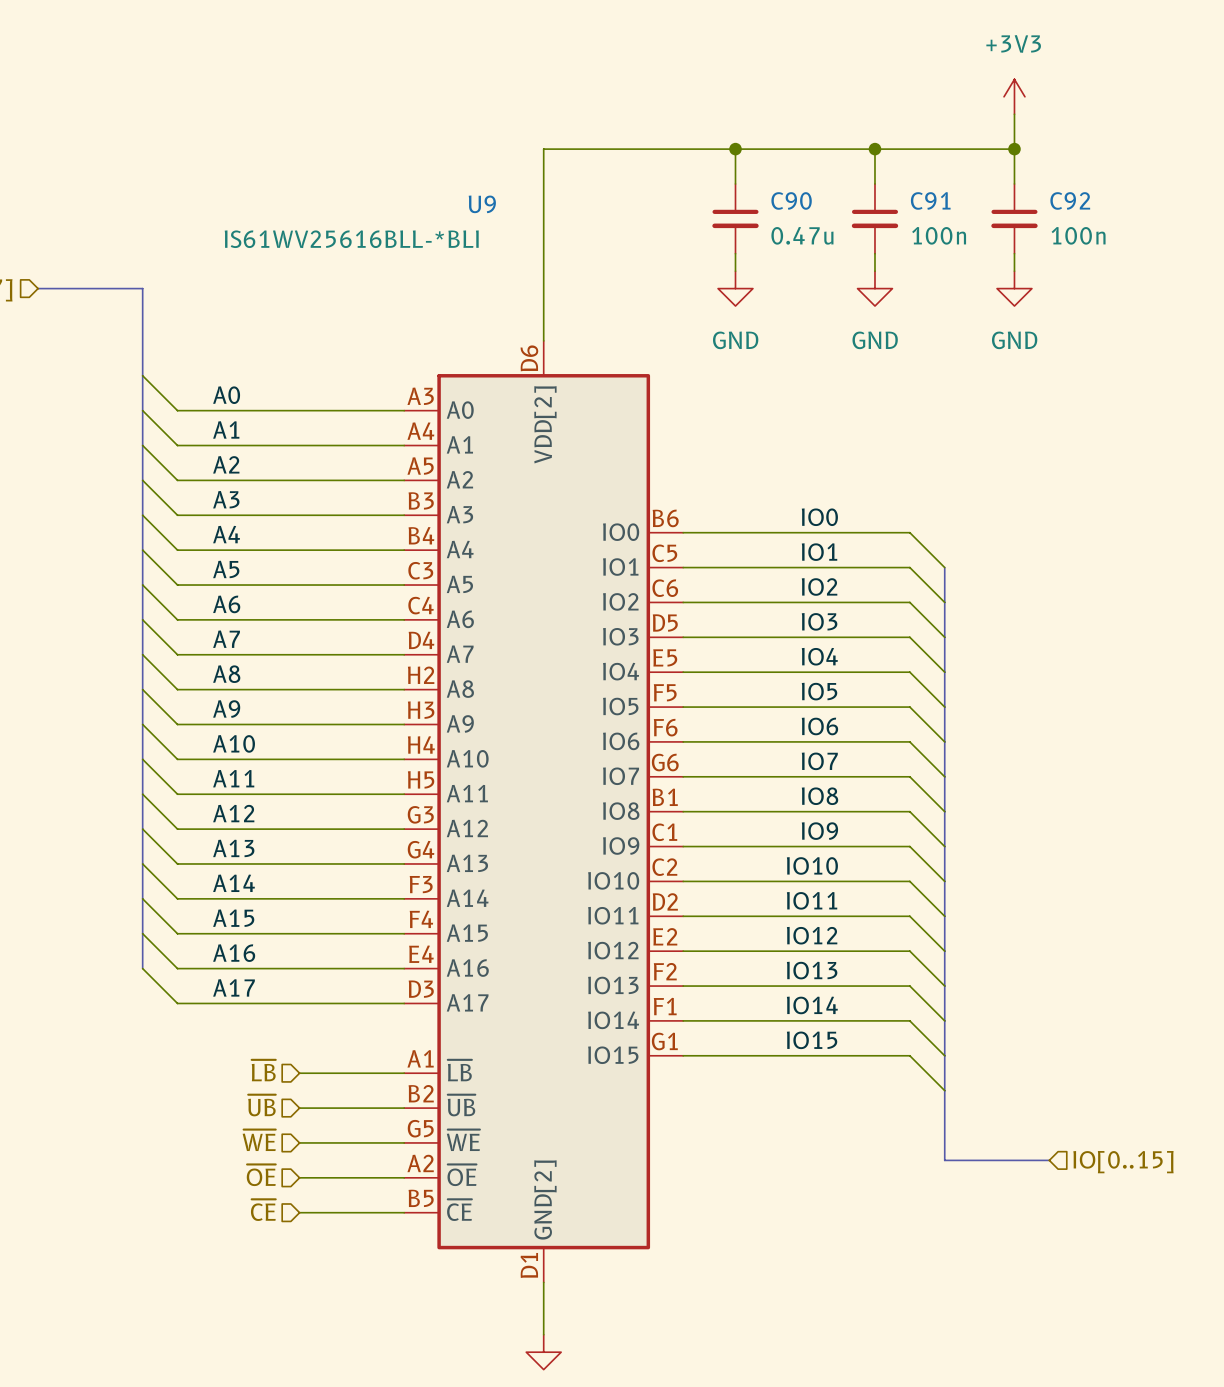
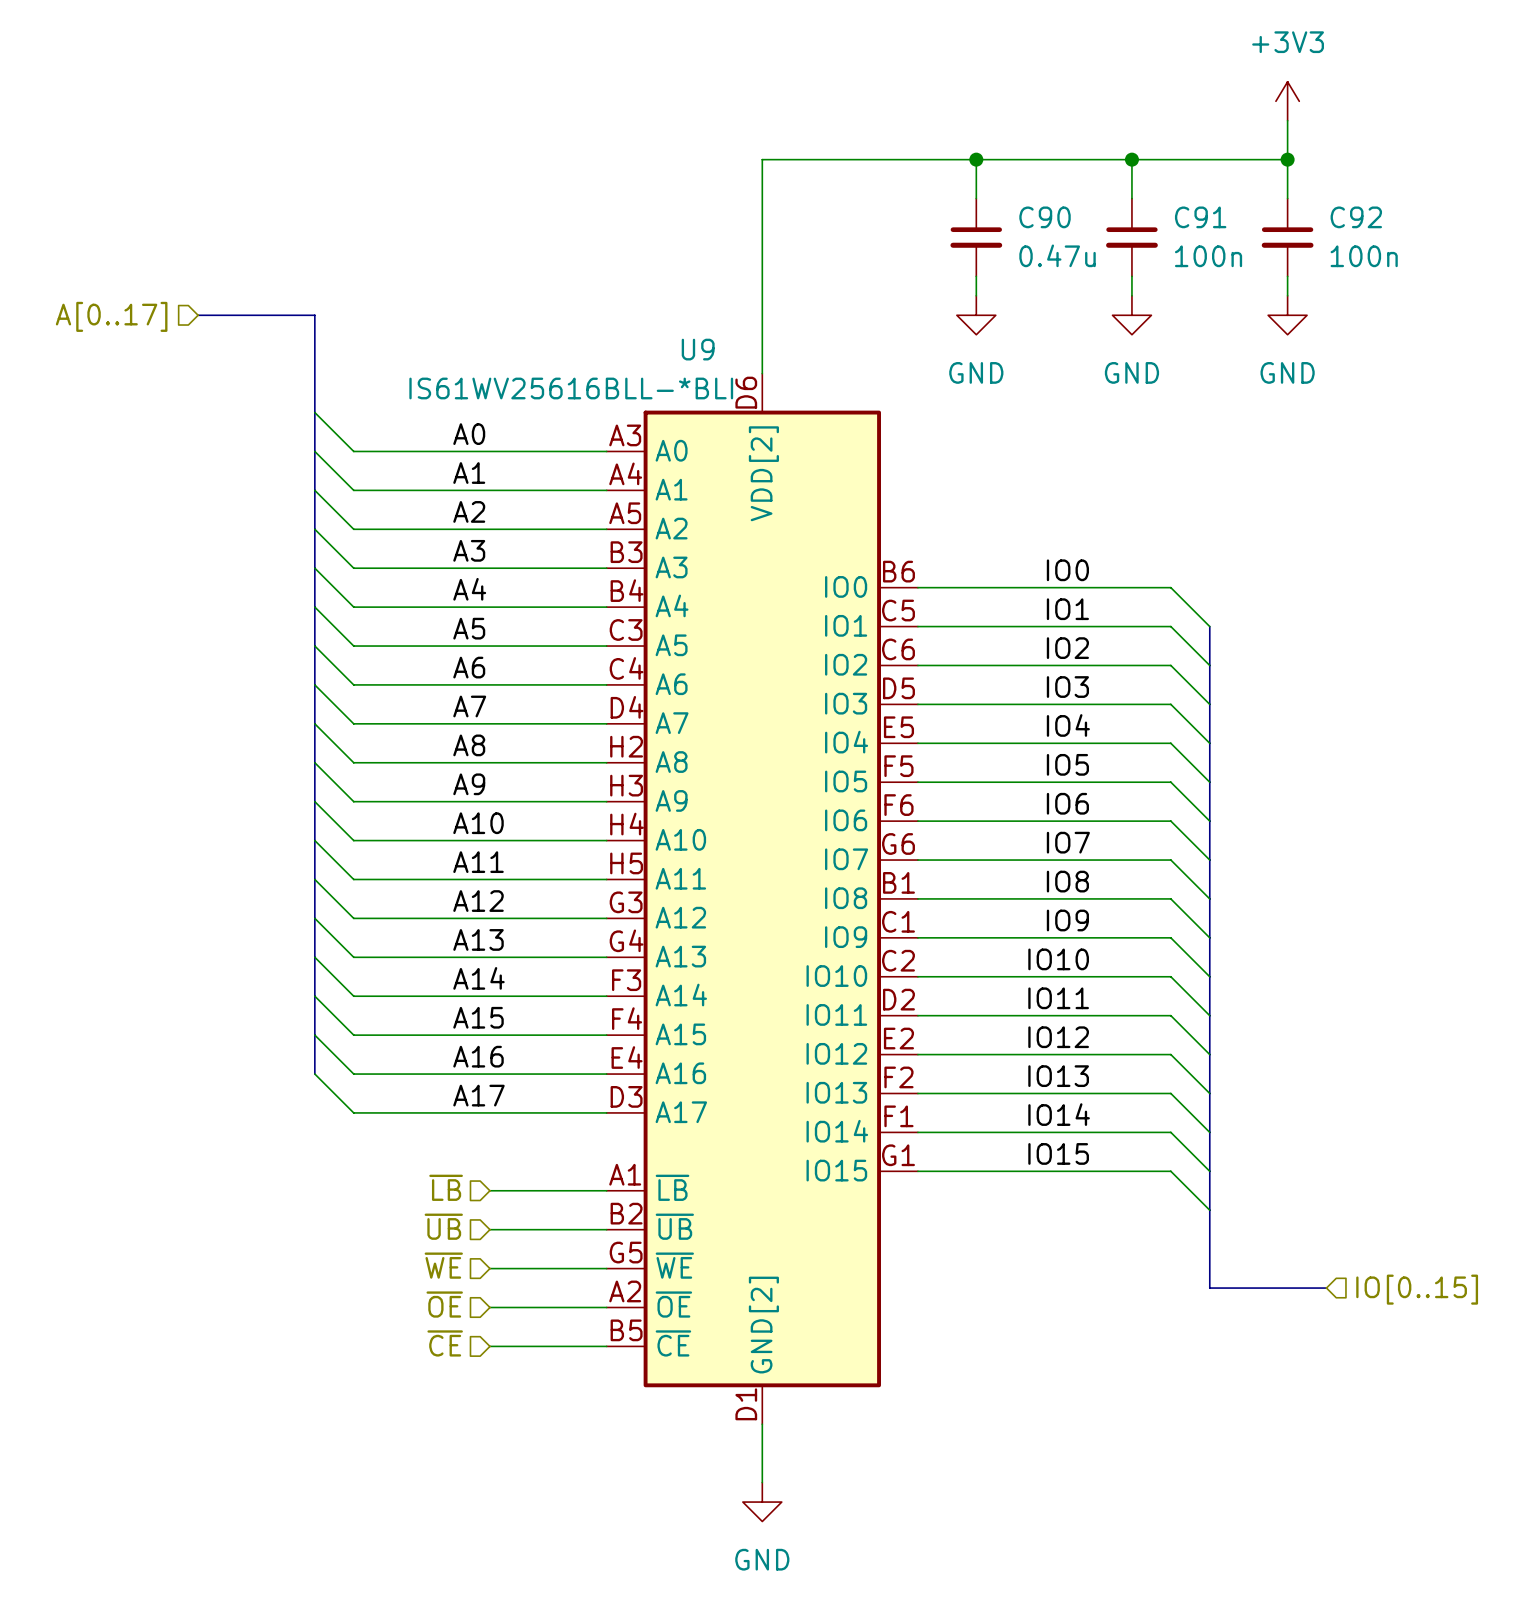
U9 name position: U9 (482, 204) -> U9 (698, 349)
U9 value position: IS61WV25616BLL-*BLI (351, 239) -> IS61WV25616BLL-*BLI (571, 388)
label position: A0 (226, 395) -> A0 (469, 434)
label position: A1 (226, 429) -> A1 (469, 473)
label position: A2 (226, 464) -> A2 (469, 511)
label position: A3 (226, 499) -> A3 (469, 550)
label position: A4 (226, 534) -> A4 (469, 589)
label position: A5 (226, 569) -> A5 (469, 628)
label position: A6 (226, 604) -> A6 (469, 667)
label position: A7 (226, 639) -> A7 (469, 706)
label position: A8 (226, 674) -> A8 (469, 745)
label position: A9 (226, 709) -> A9 (469, 784)
label position: A10 (234, 743) -> A10 (478, 823)
label position: A11 (233, 778) -> A11 (478, 862)
label position: A12 (233, 813) -> A12 (478, 901)
label position: A13 (233, 848) -> A13 (478, 939)
label position: A14 (233, 883) -> A14 (478, 978)
label position: A15 (233, 918) -> A15 (478, 1017)
label position: A16 (234, 953) -> A16 (478, 1056)
label position: A17 (233, 987) -> A17 (478, 1095)

